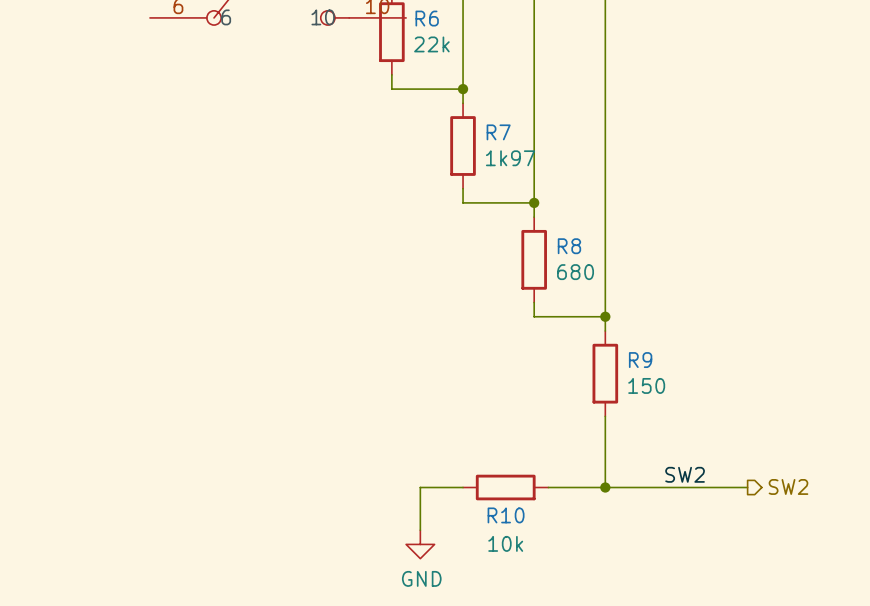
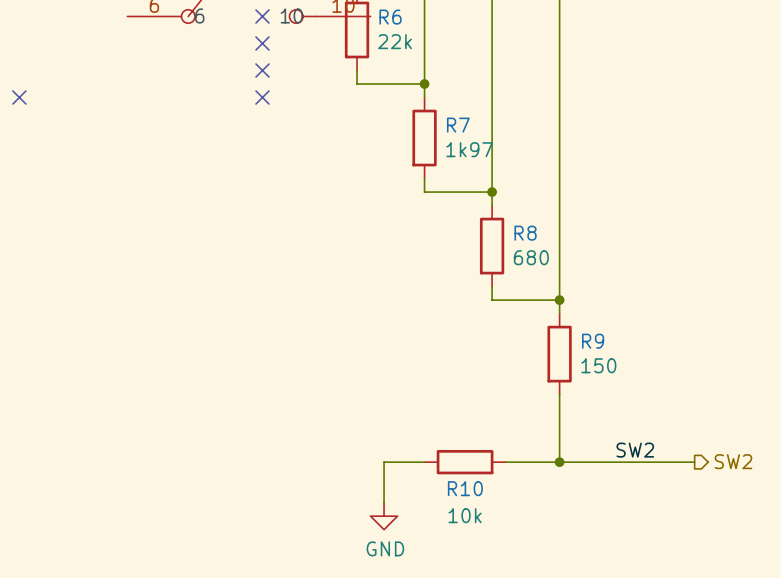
no-connect mark: none -> (262, 16)
no-connect mark: none -> (262, 43)
no-connect mark: none -> (262, 70)
no-connect mark: none -> (19, 97)
no-connect mark: none -> (262, 97)

